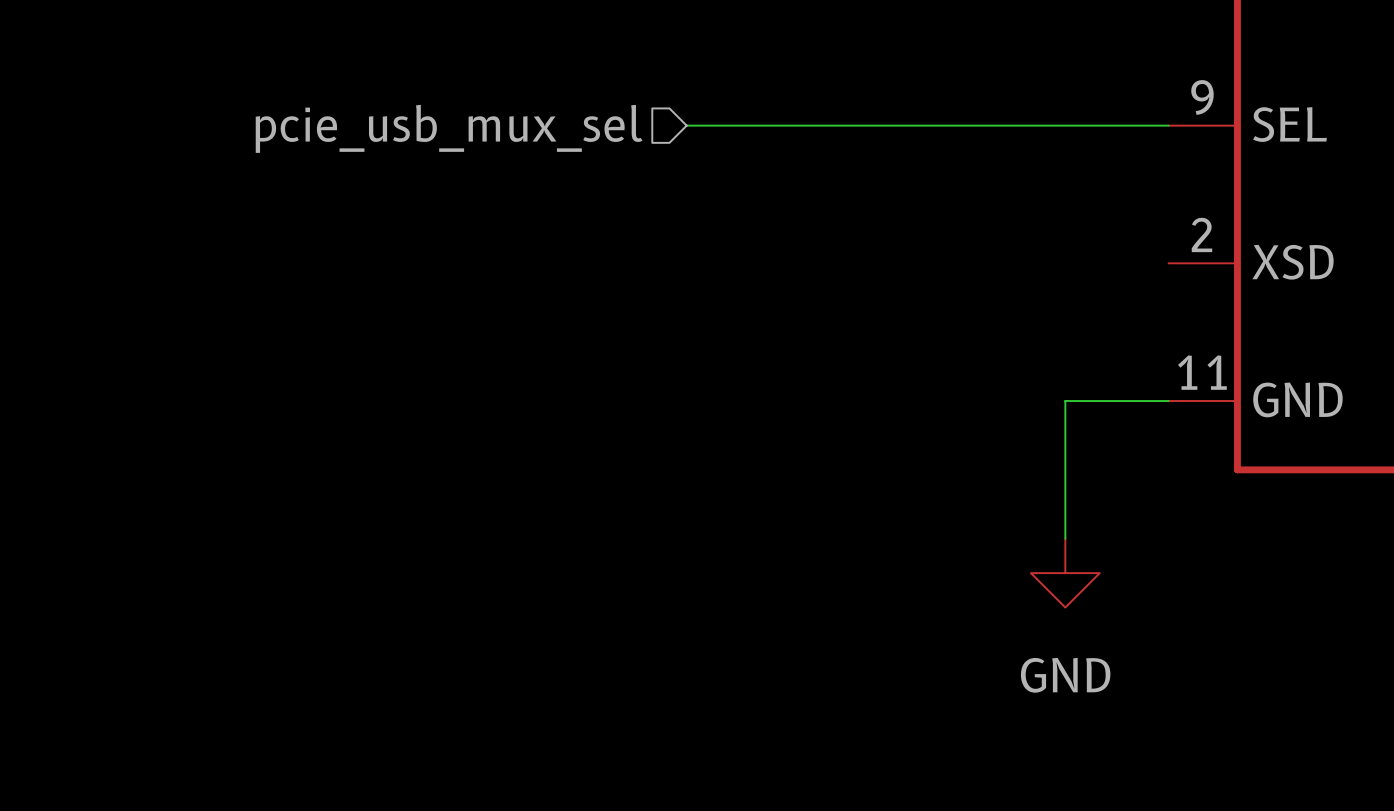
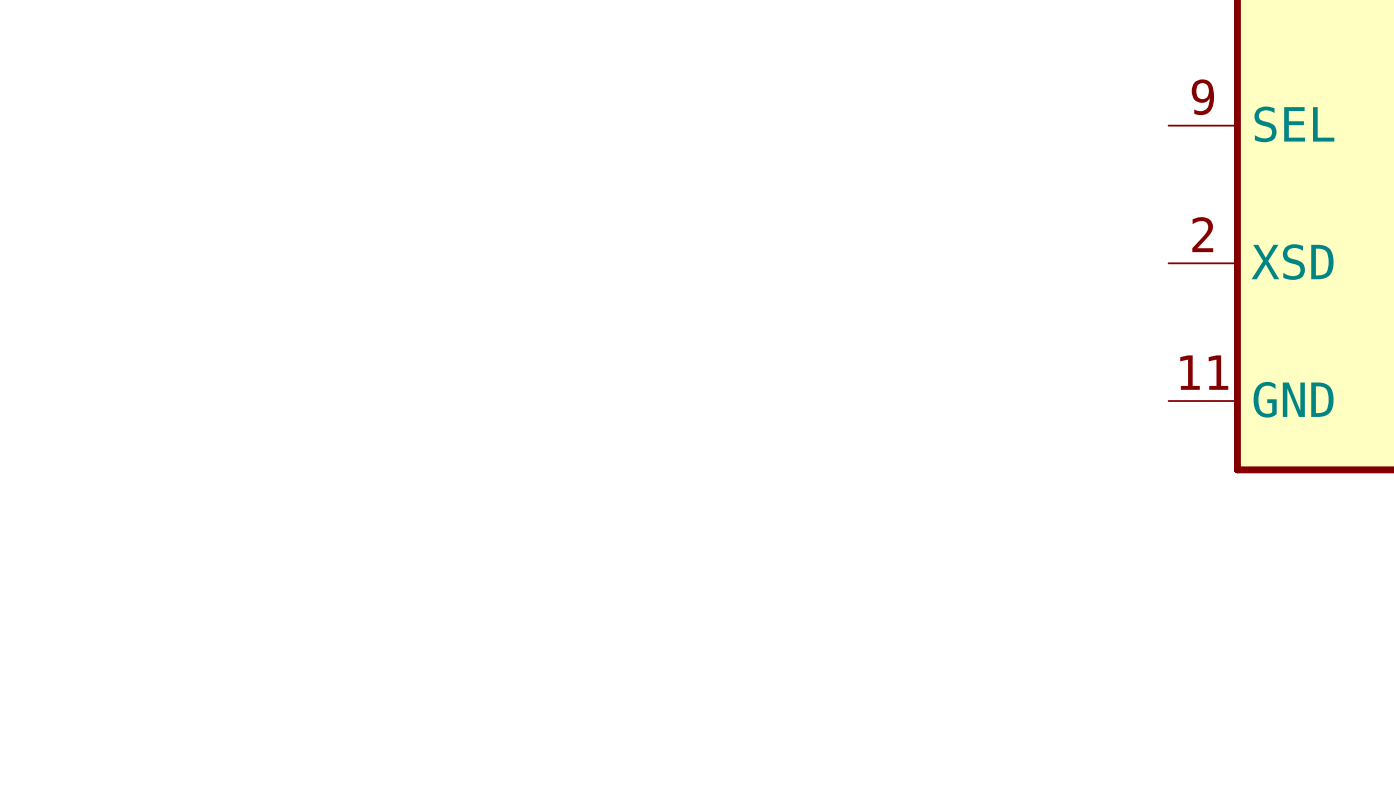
wire: (686, 125) (1168, 125) -> none
hierarchical label: pcie_usb_mux_sel (449, 128) -> none
wire: (1168, 401) (1065, 401) (1065, 538) -> none
power symbol: GND (1065, 573) -> none

